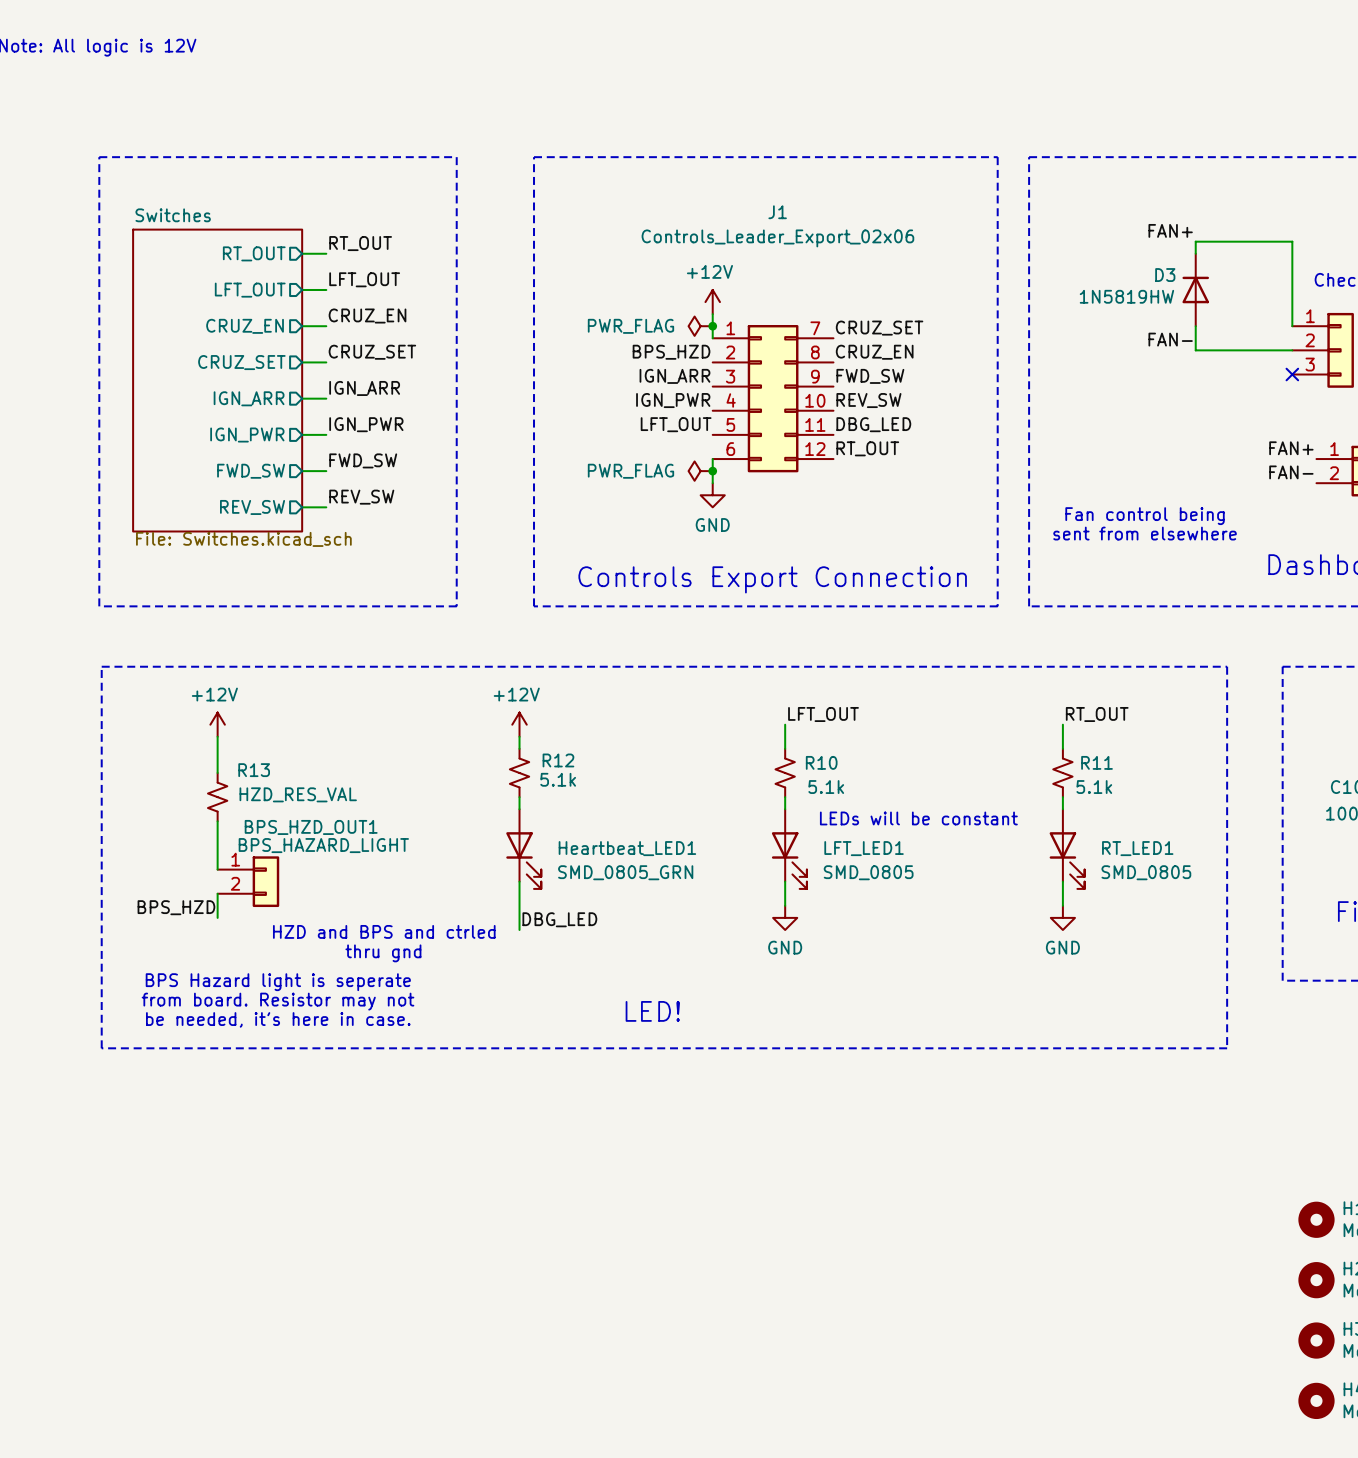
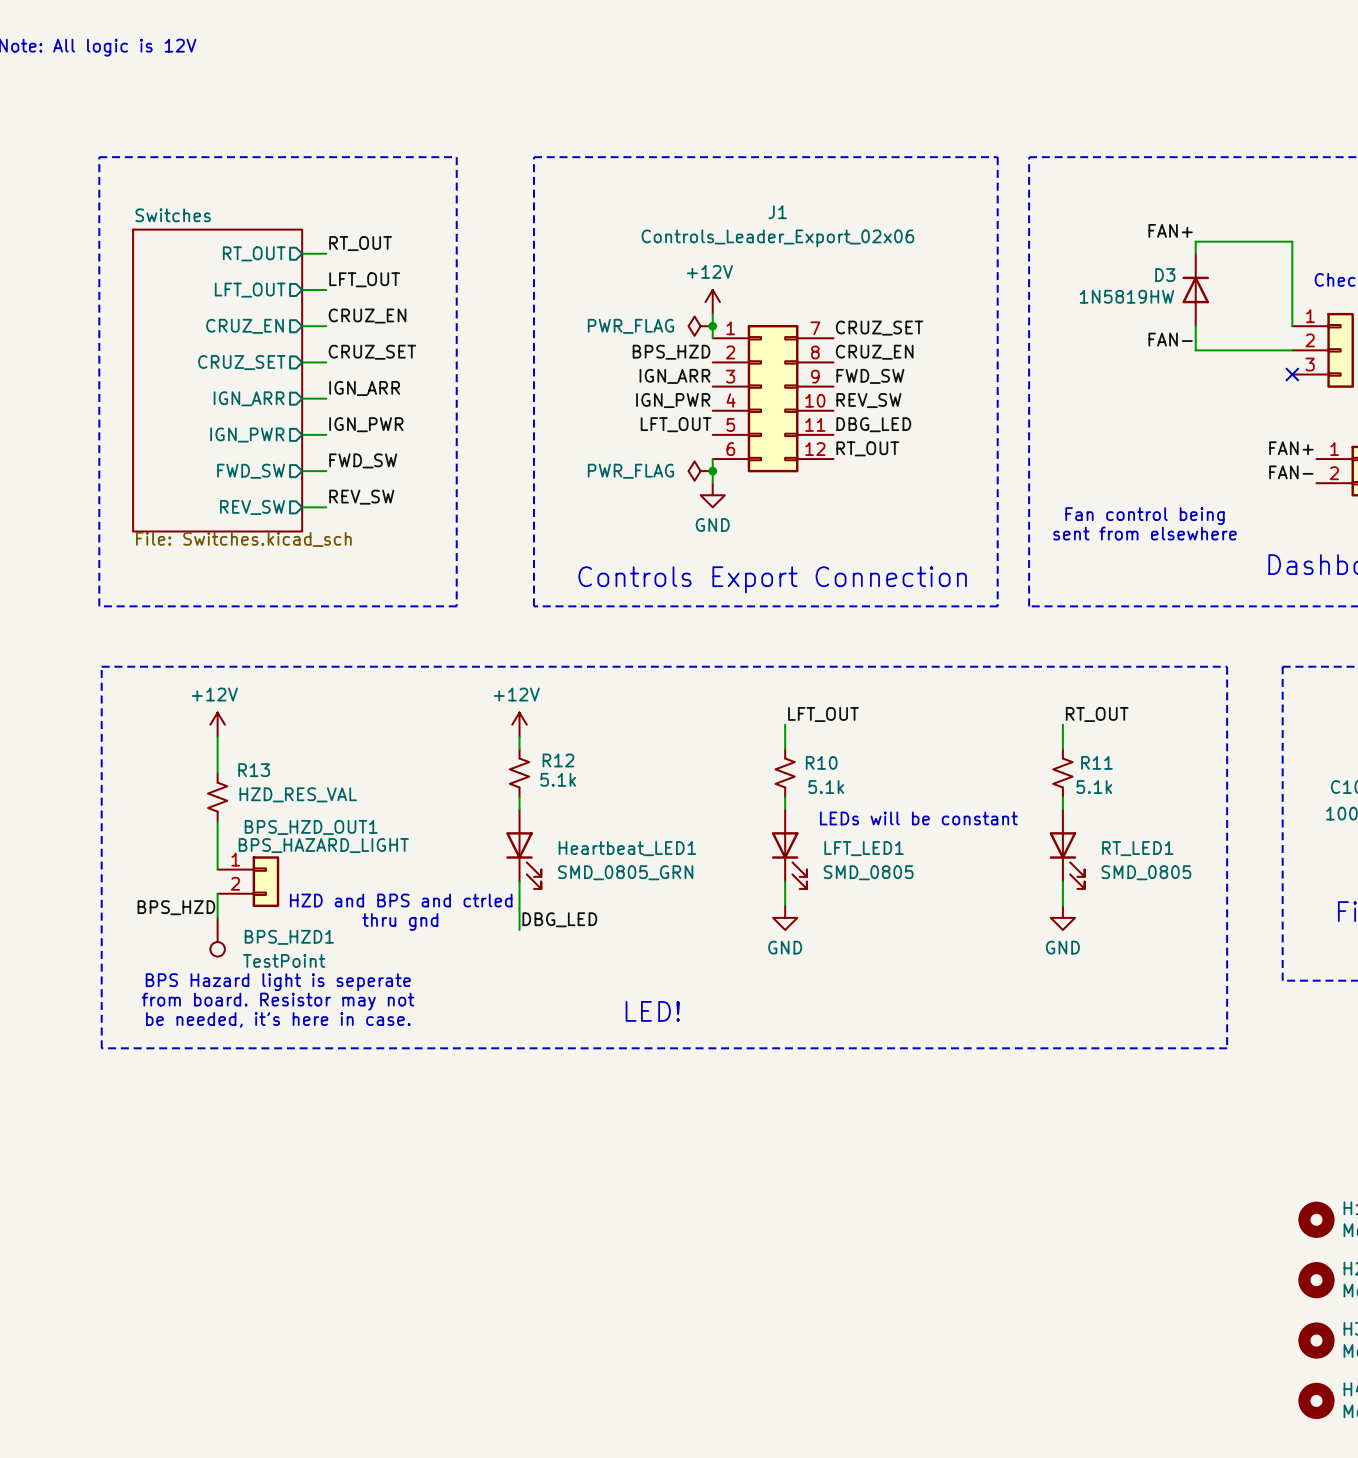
text position: HZD and BPS and ctrled (384, 931) -> HZD and BPS and ctrled (401, 900)
BPS_HZD1: none -> TestPoint (217, 937)
text position: thru gnd (383, 953) -> thru gnd (400, 921)

